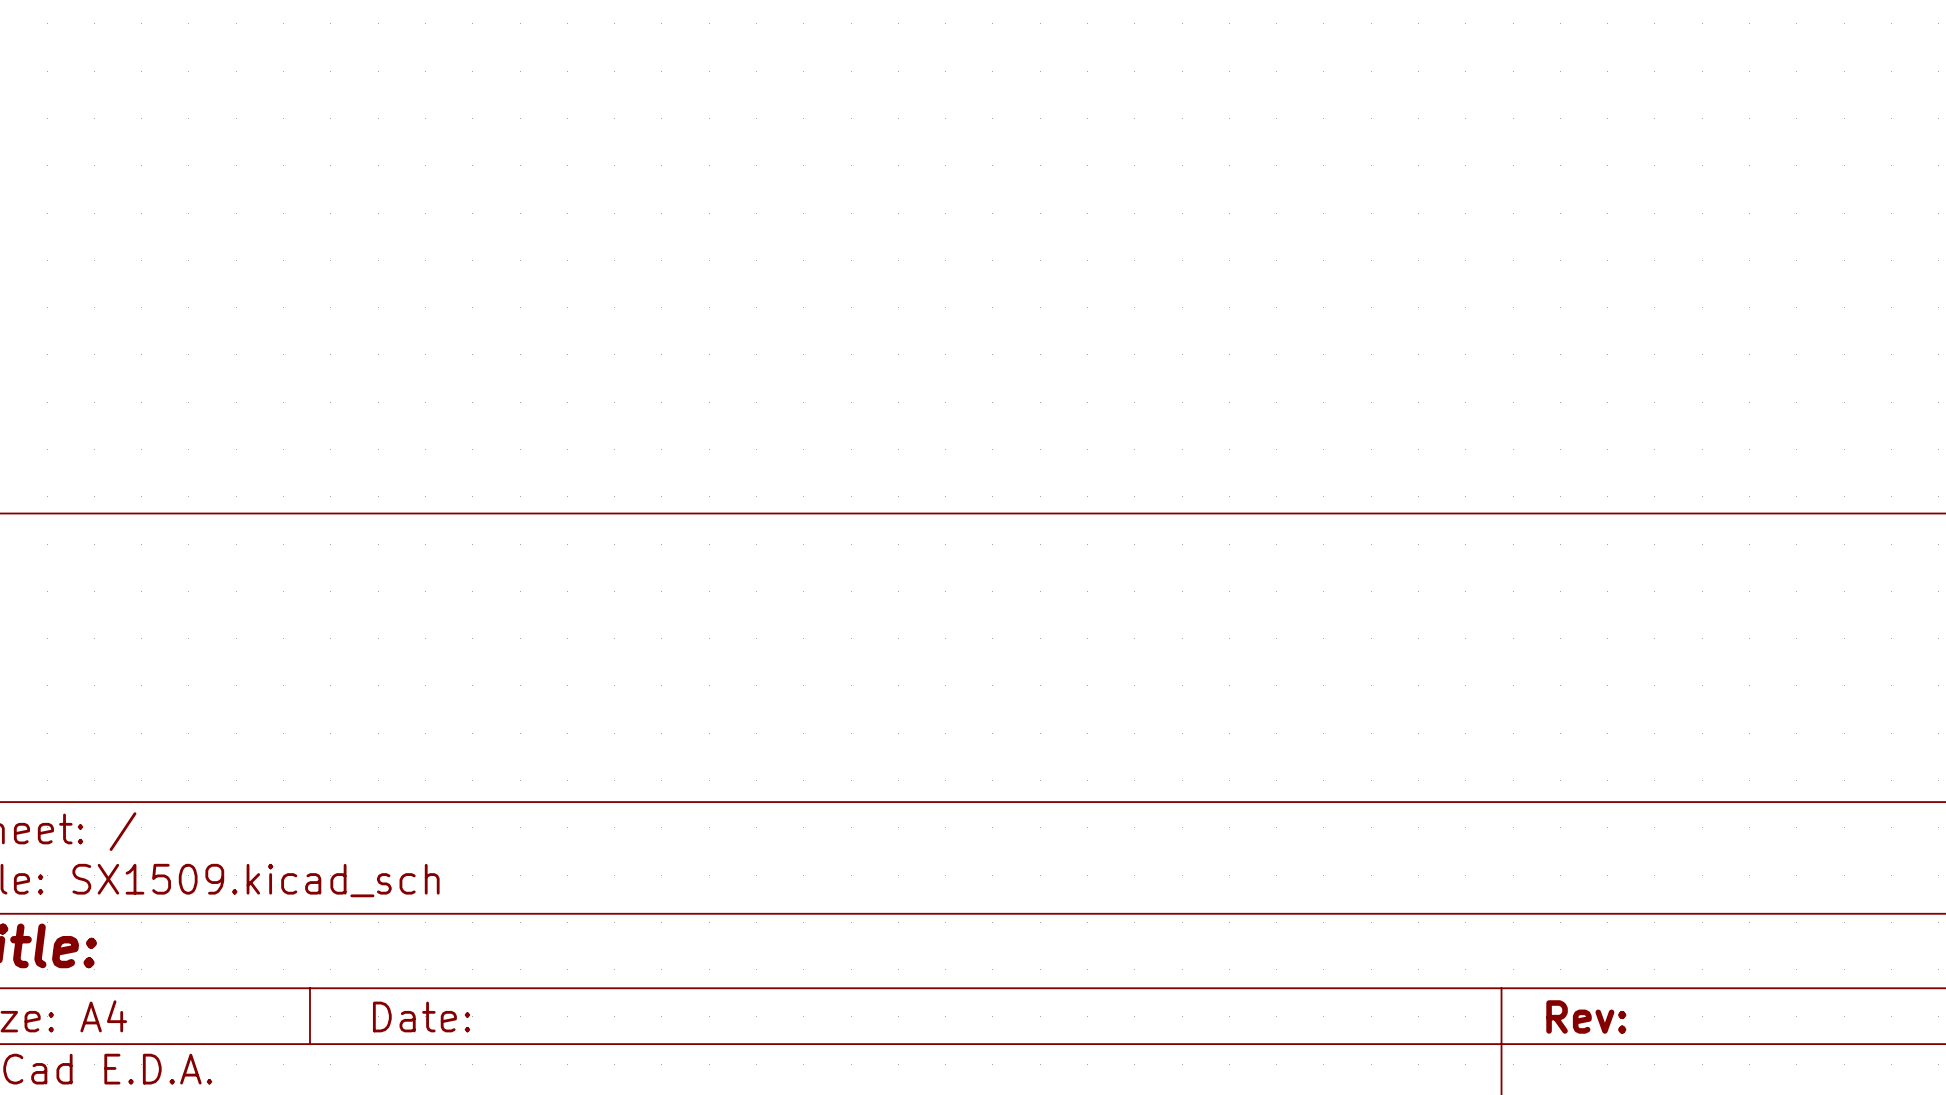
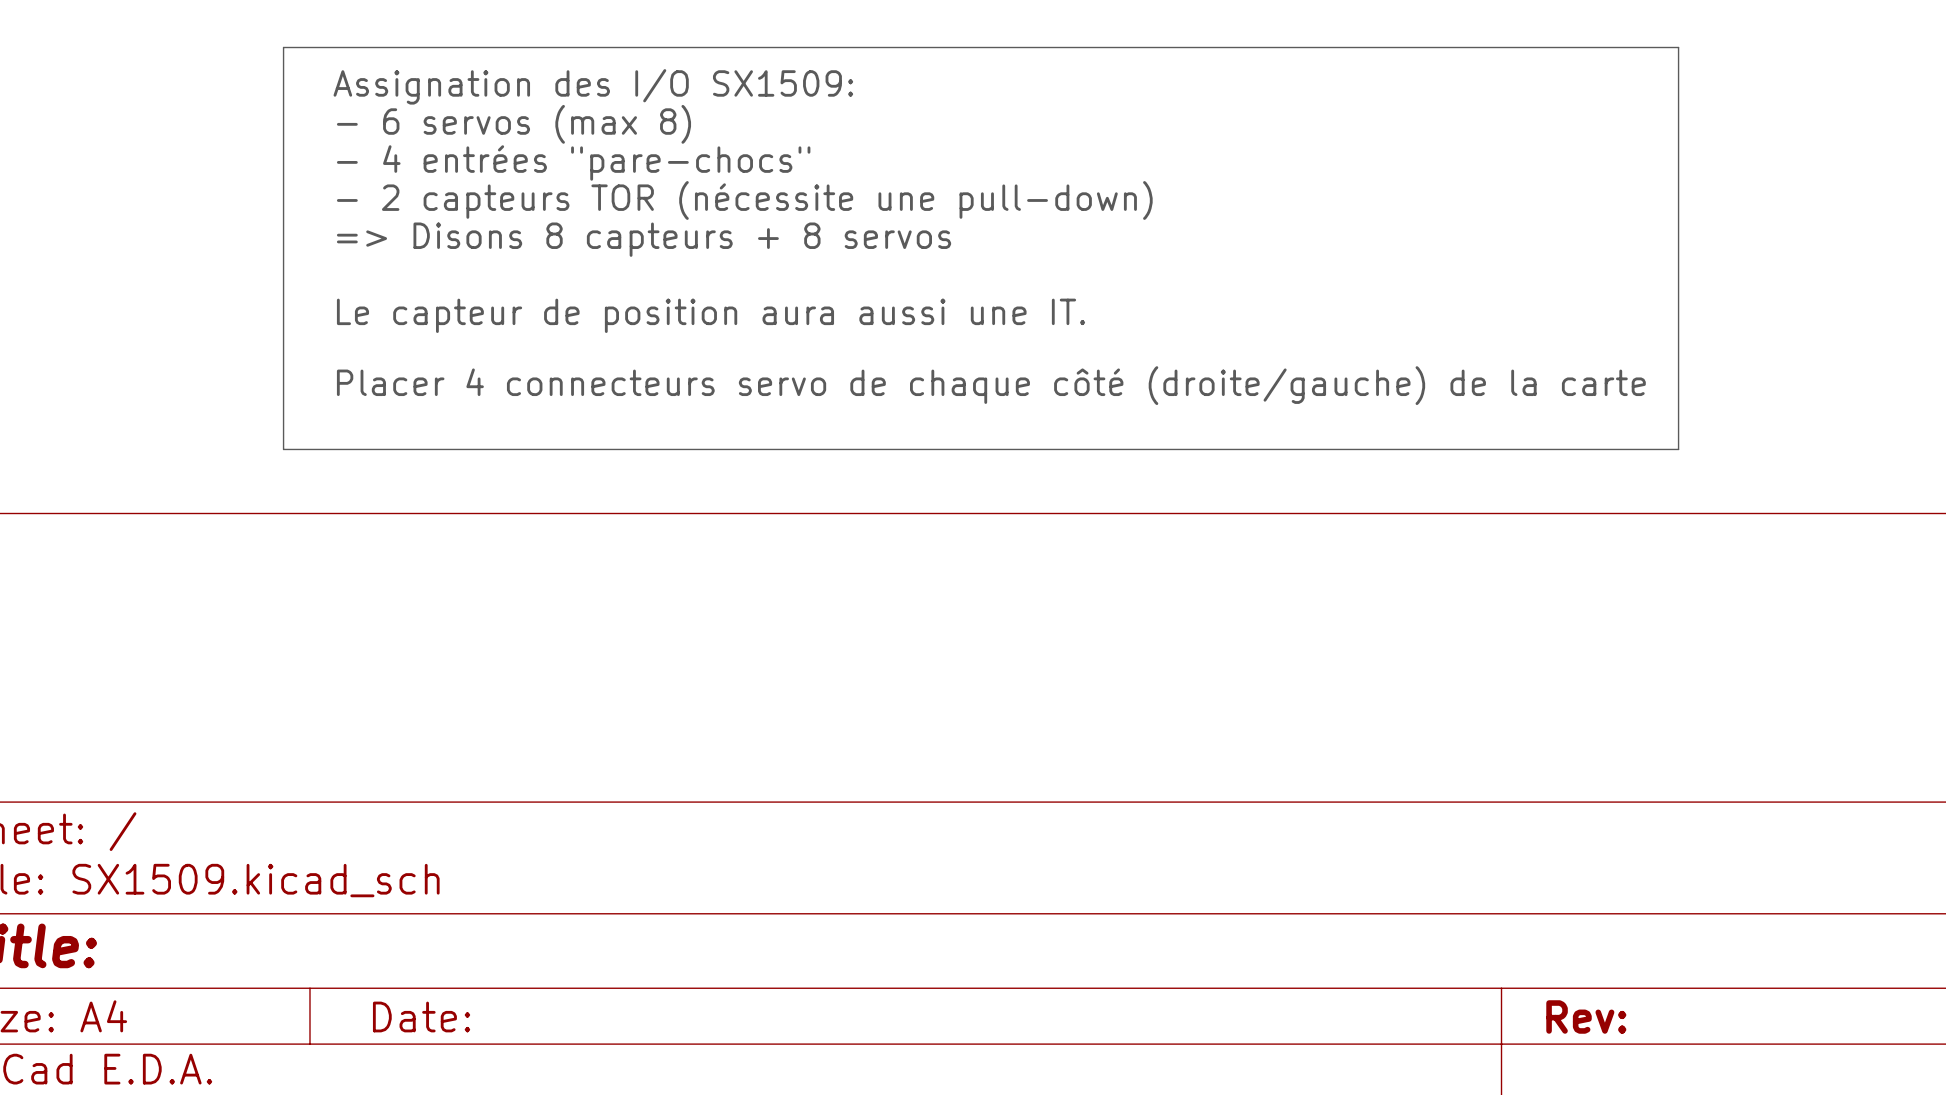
line: none -> (283, 47) (1678, 47) (1678, 449) (283, 449) (283, 47)
text: none -> Assignation des I/O SX1509: (593, 86)
text: none -> - 6 servos (max 8) (513, 124)
text: none -> - 4 entrées "pare-chocs" (573, 162)
text: none -> - 2 capteurs TOR (nécessite une pull-down) (744, 200)
text: none -> => Disons 8 capteurs + 8 servos (644, 239)
text: none -> Le capteur de position aura aussi une IT. (711, 315)
text: none -> Placer 4 connecteurs servo de chaque côté (droite/gauche) de la carte (991, 385)

